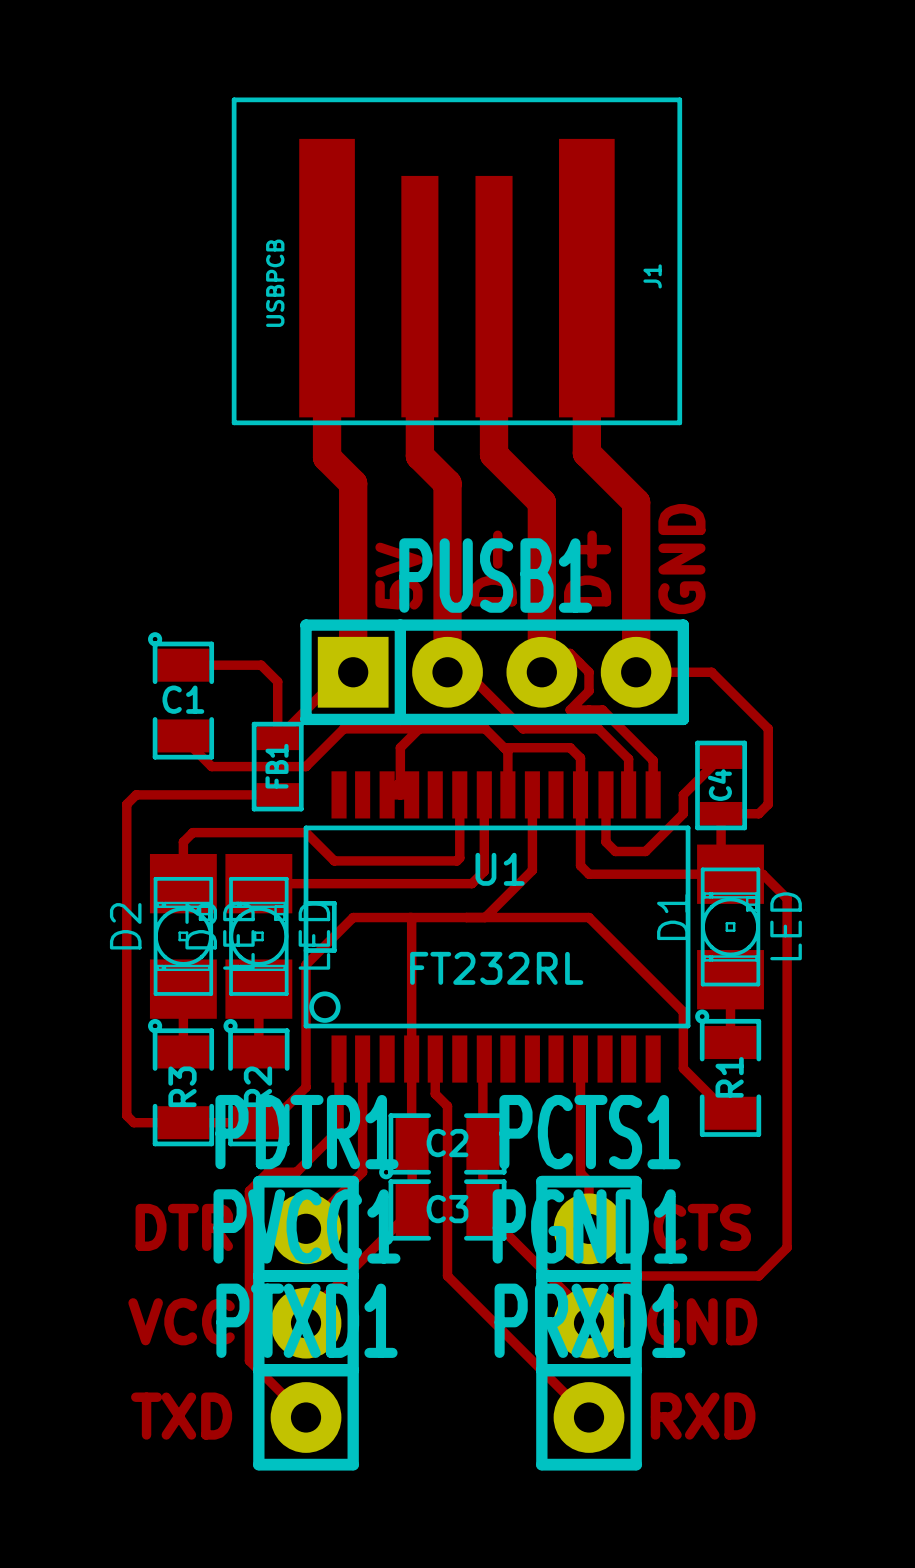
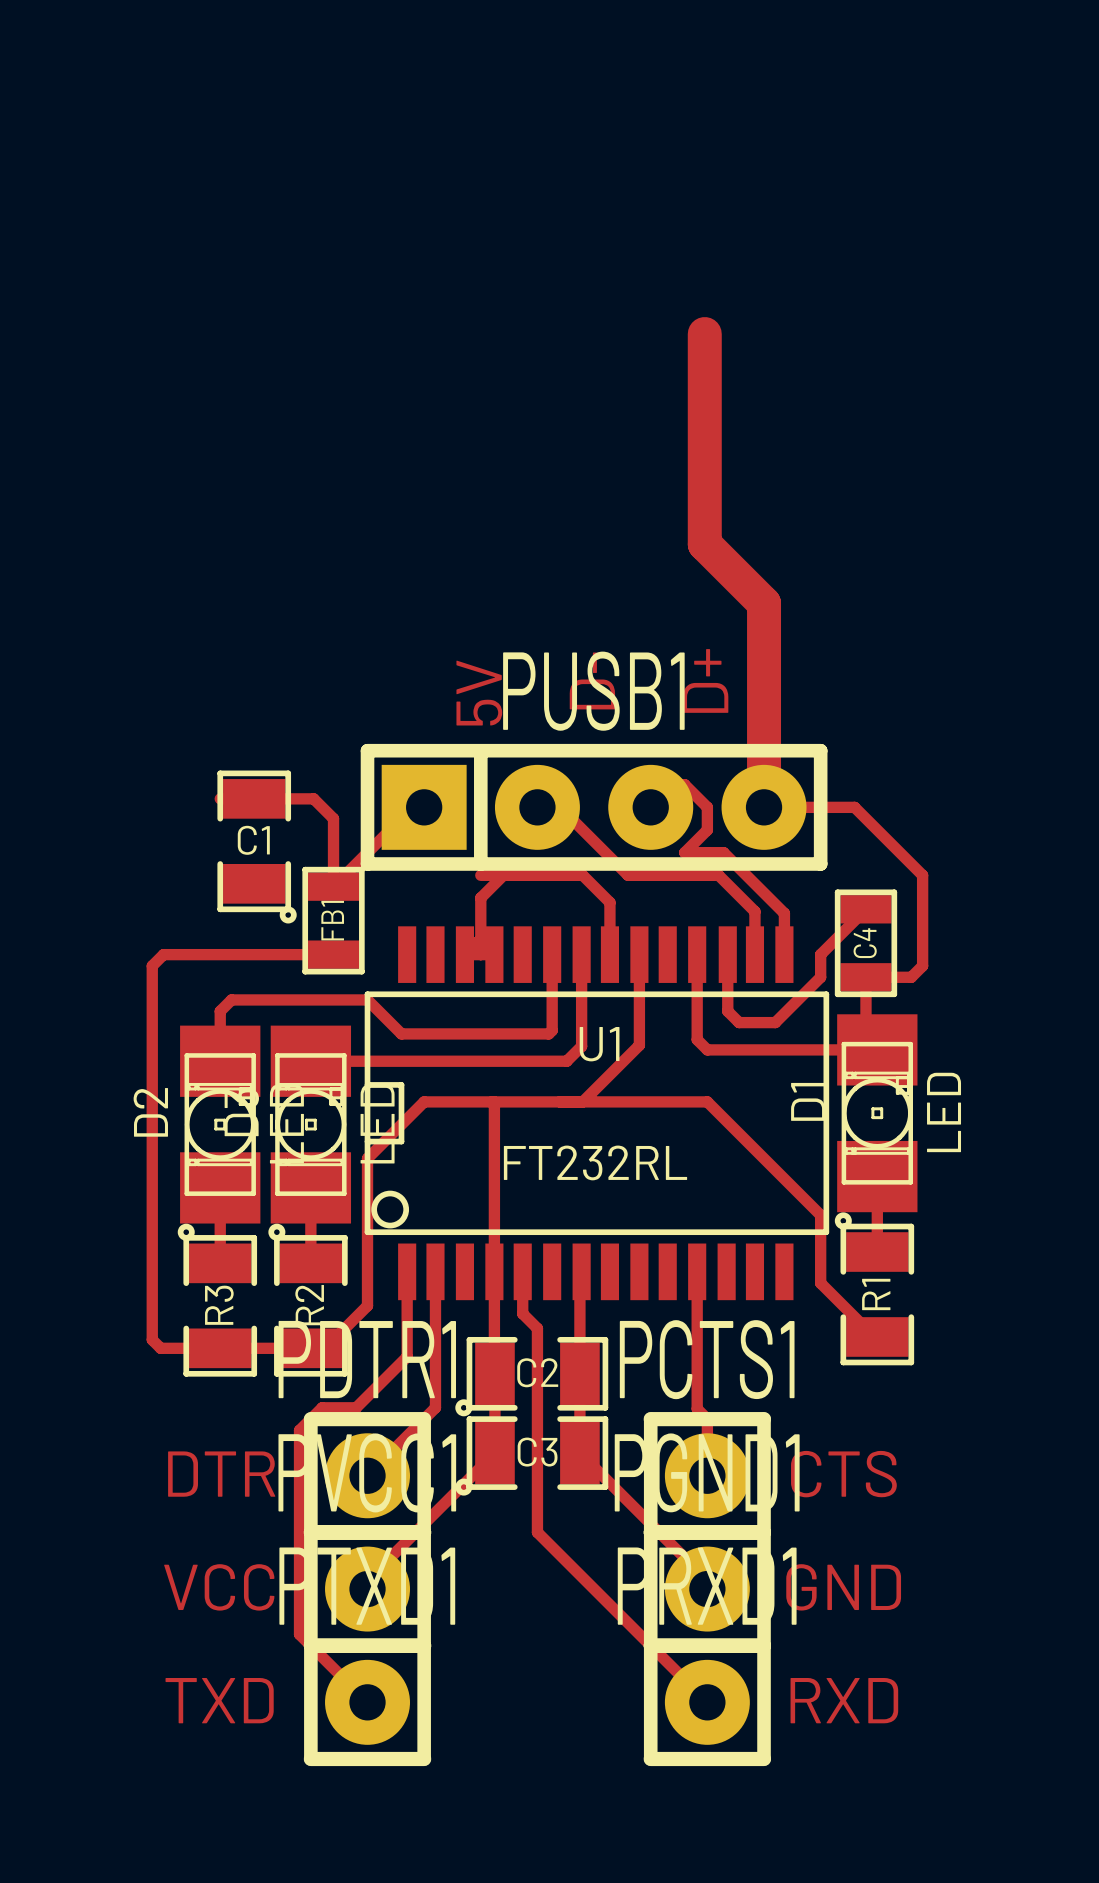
J1: USBPCB (456, 261) -> none
track: (327, 278) (327, 457) (353, 483) (353, 672) -> none
track: (419, 296) (419, 455) (447, 483) (447, 672) -> none
track: (494, 296) (494, 454) (541, 502) (541, 672) -> none
text: GND (681, 559) -> none
C1 rotation: 0° (181, 695) -> 180° (257, 847)
track: (400, 728) (343, 728) (306, 766) (211, 766) (183, 738) (183, 735) -> none
track: (504, 747) (570, 747) (580, 758) (580, 794) -> none
track: (730, 874) (762, 874) (787, 898) (787, 1247) (758, 1275) (636, 1275) (589, 1323) -> none

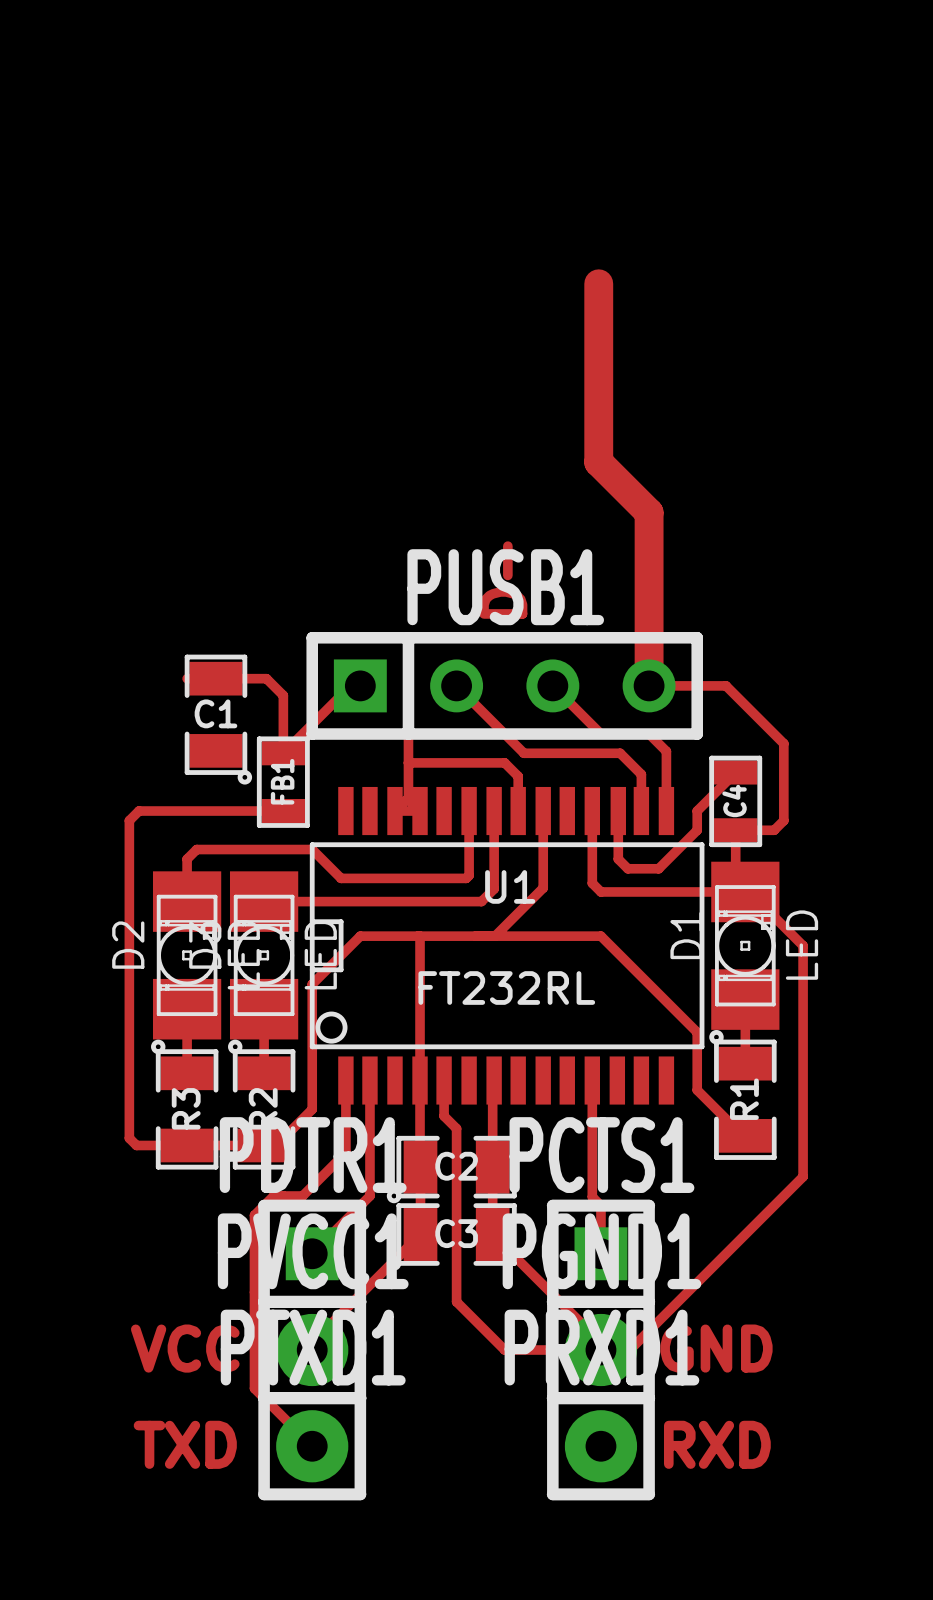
text: D+ (705, 680) -> none
text: 5V (479, 693) -> none
PUSB1 footprint: [360, 743, 828, 871] -> [306, 632, 703, 740]
track: (537, 807) (560, 807) (628, 875) (718, 875) (730, 886) -> (456, 685) (523, 753) (620, 753)
track: (650, 807) (673, 784) (684, 784) (707, 807) (707, 830) (684, 852) (723, 852) (784, 913) -> (552, 685) (600, 733) (648, 733) (666, 751) (666, 775)
track: (480, 875) (582, 875) (609, 902) (609, 913) -> (408, 637) (408, 762) (504, 762) (518, 776)
track: (503, 875) (480, 897) -> none
PDTR1 footprint: [303, 1412, 432, 1540] -> [258, 1199, 367, 1308]
PCTS1 footprint: [643, 1412, 772, 1540] -> [546, 1199, 656, 1308]
text: DTR (221, 1474) -> none
text: CTS (843, 1474) -> none
track: (594, 1589) (707, 1702) -> (504, 1350) (629, 1350) (803, 1176) (803, 945) (749, 891) (745, 891)

